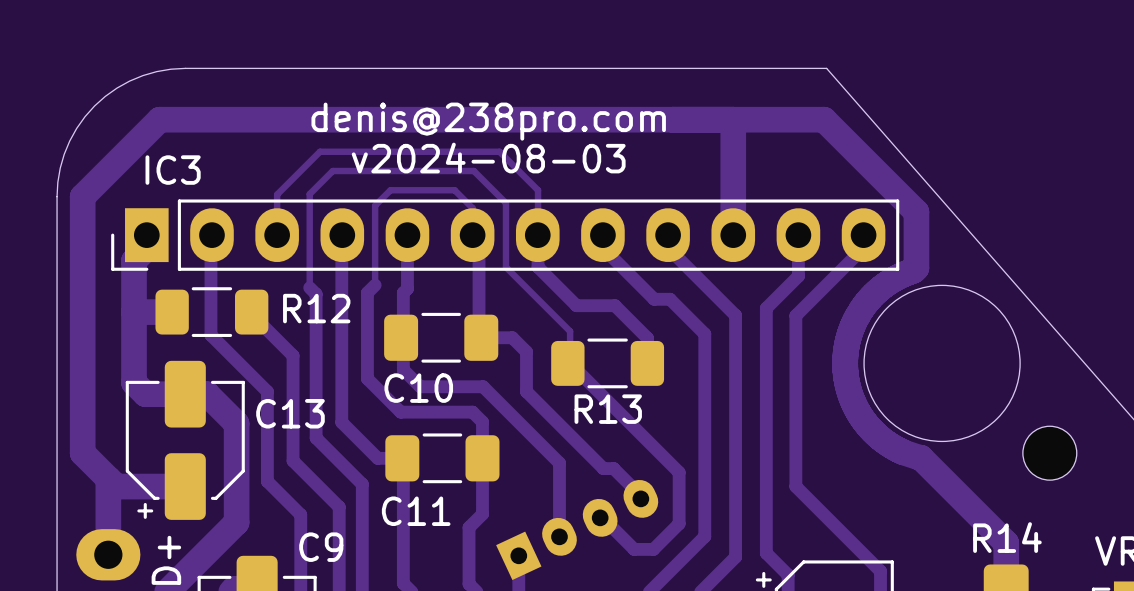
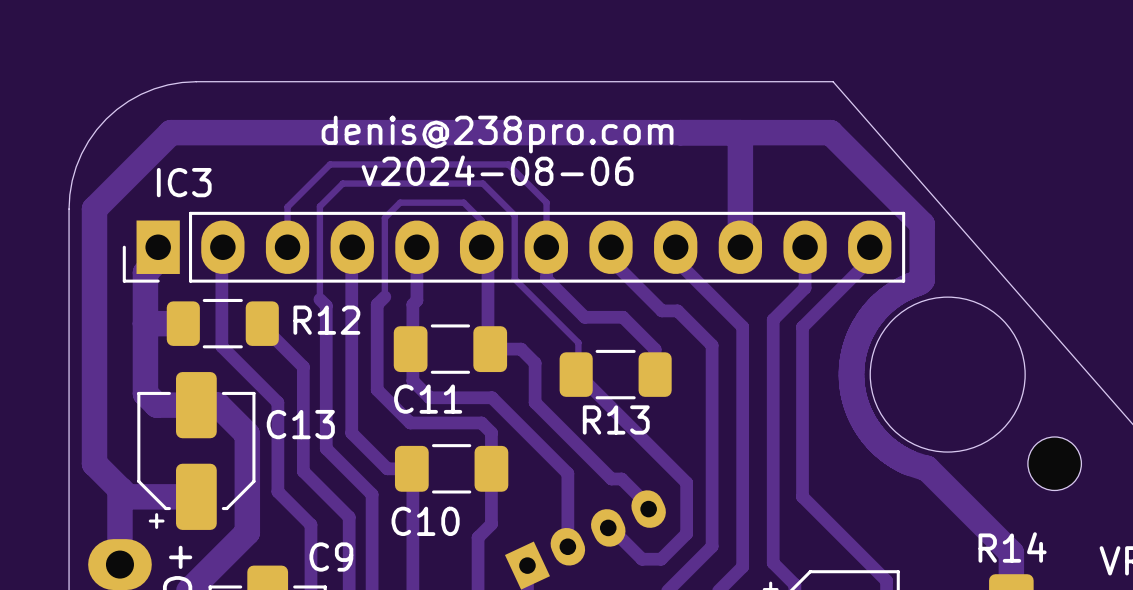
text: v2024-08-03 (488, 158) -> v2024-08-06 (497, 170)
C10 name: C10 (418, 388) -> C11 (428, 399)
C11 name: C11 (416, 511) -> C10 (425, 521)

